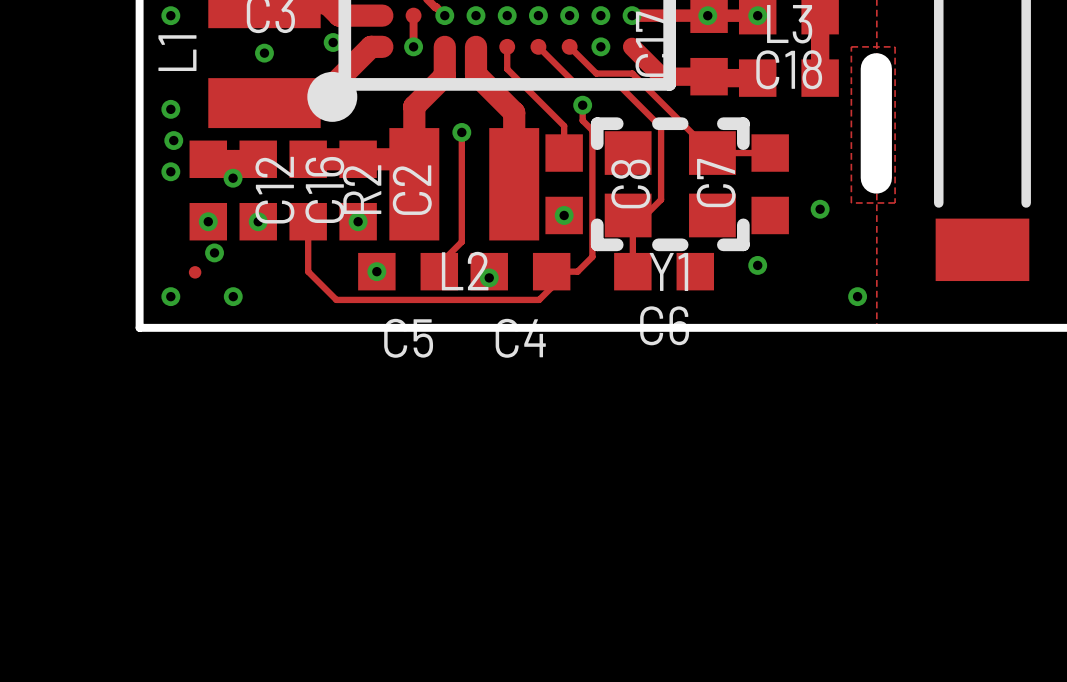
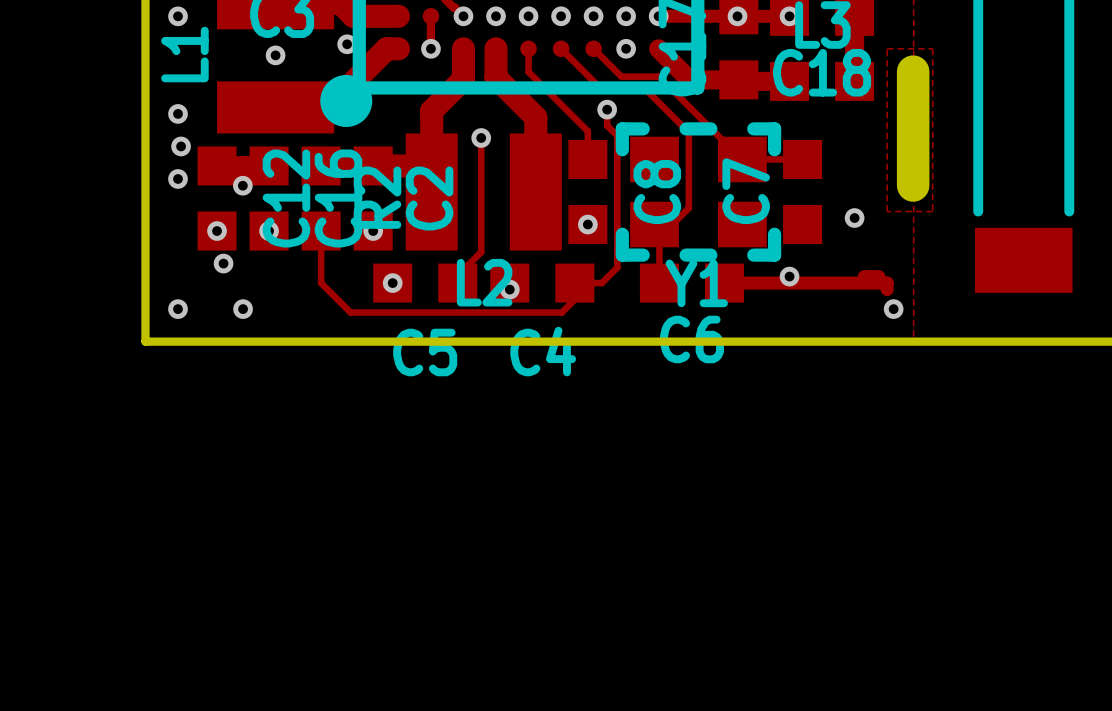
track: none -> (864, 276) (878, 276)
track: none -> (724, 283) (887, 283) (887, 289)
part: (195, 272) -> none

